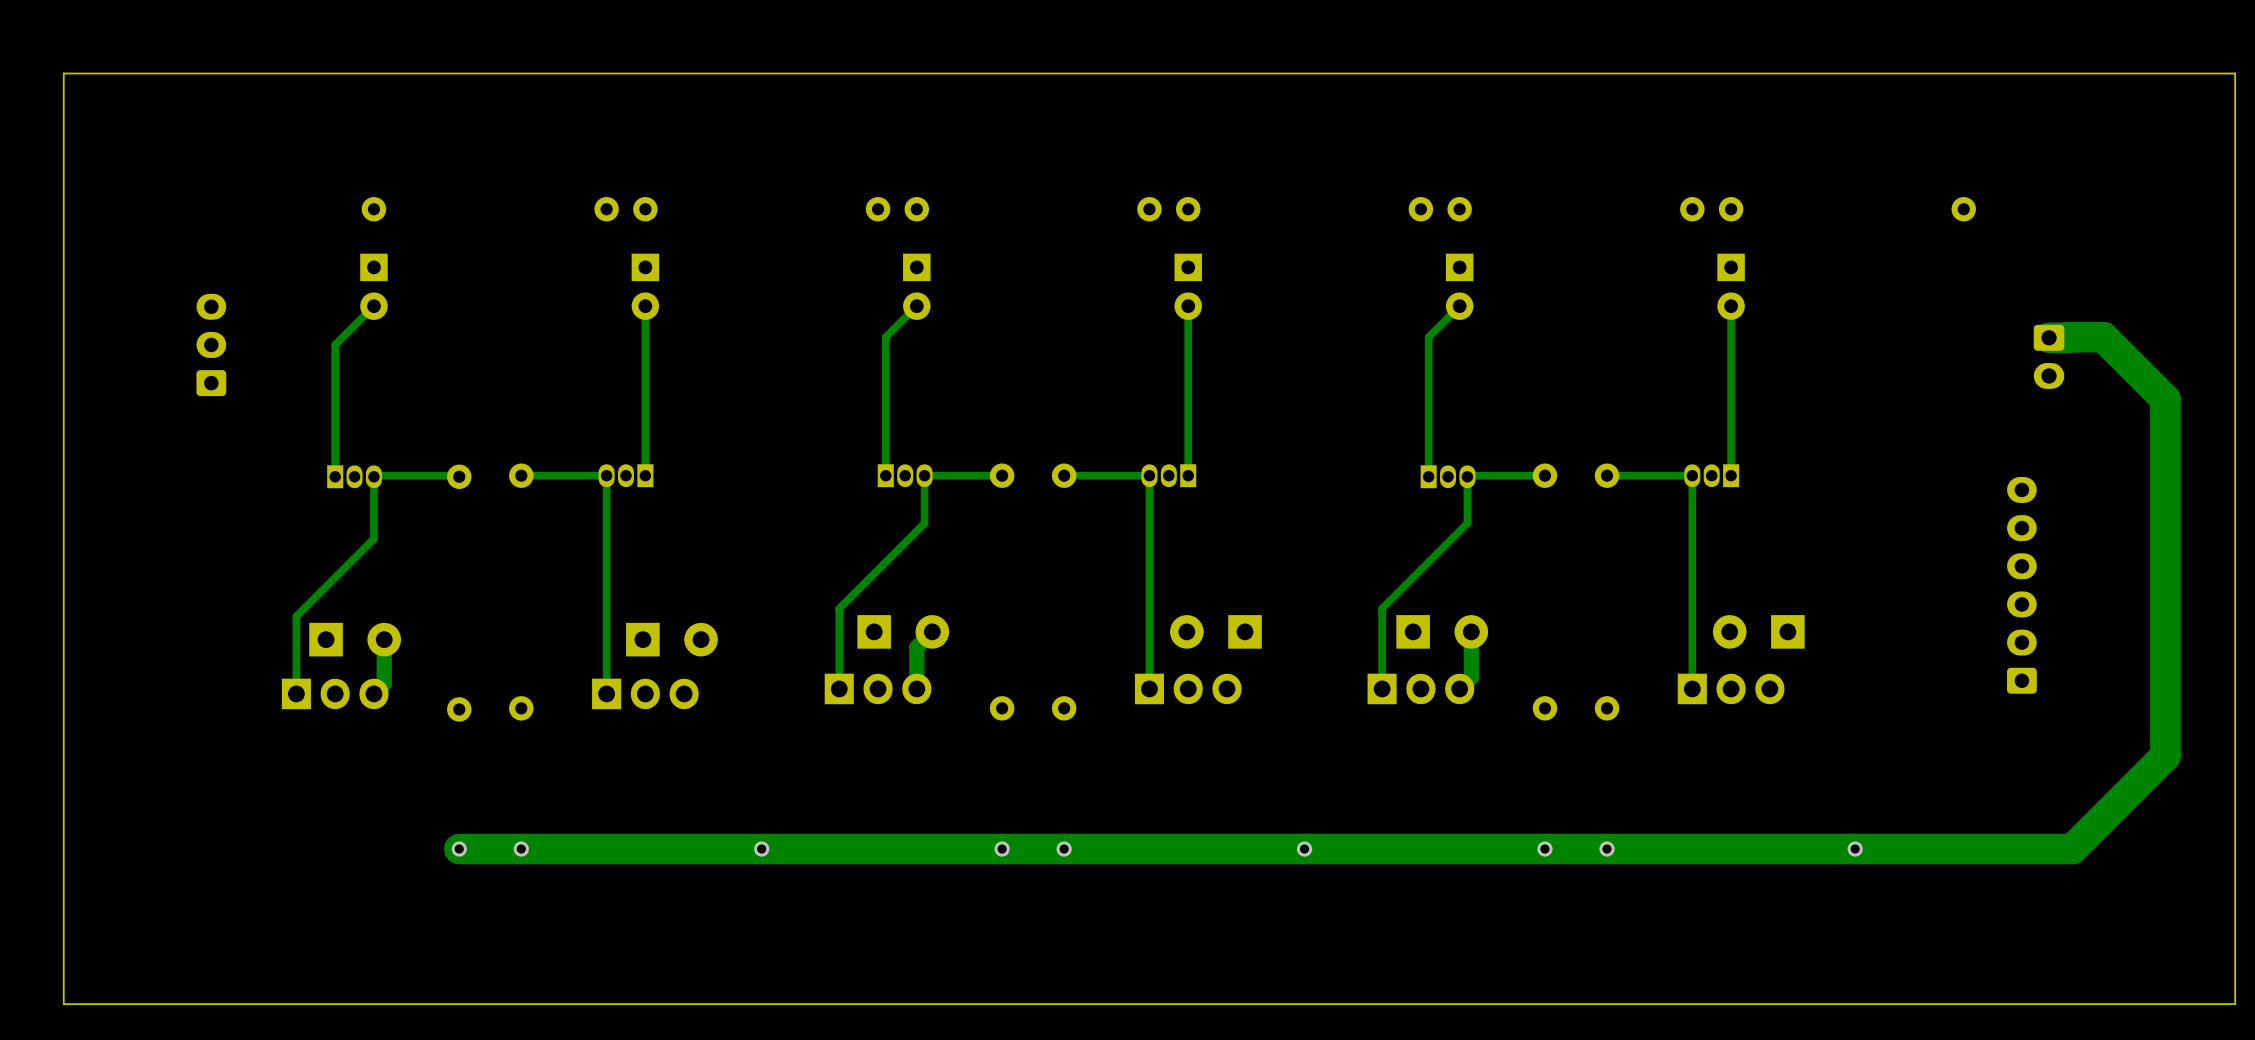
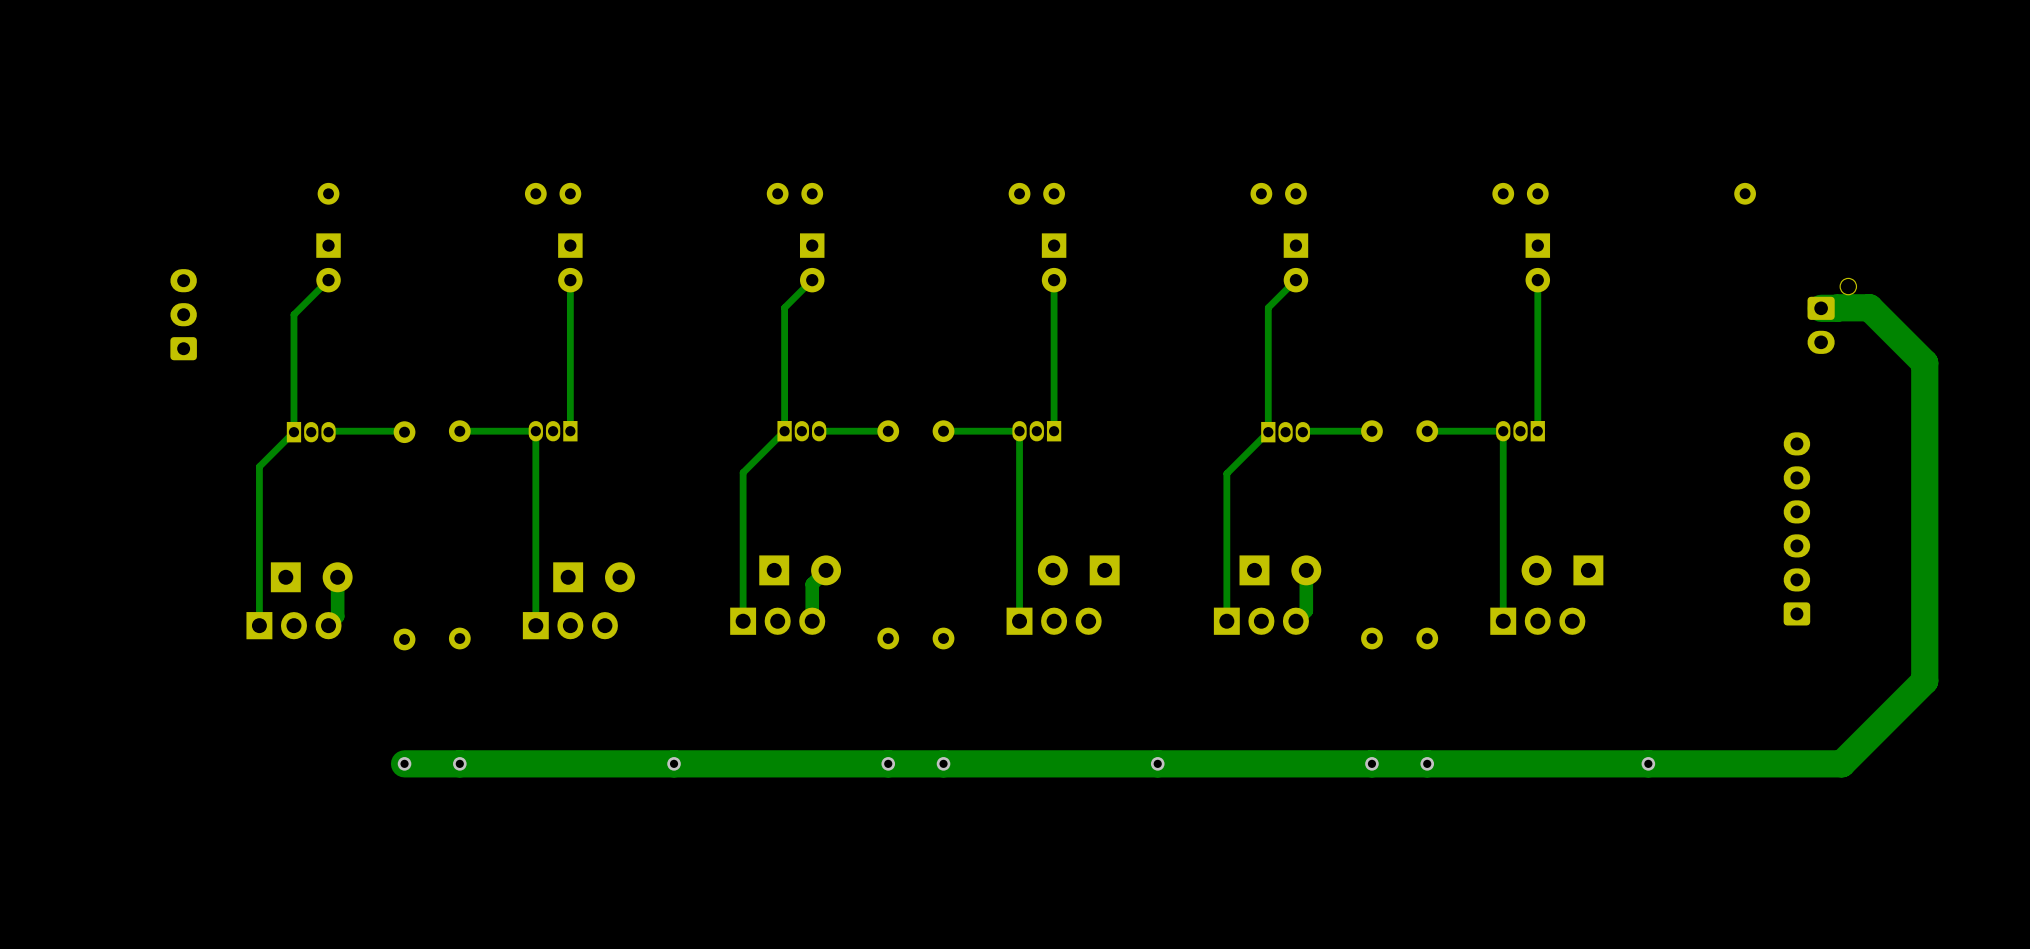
board edge: (2235, 73) (63, 73) (63, 1004) (2235, 1004) (2235, 73) -> none
part: none -> (1831, 316)
track: (924, 475) (924, 523) (839, 608) -> (784, 431) (743, 472) (743, 549)
track: (373, 476) (373, 538) (296, 616) -> (293, 432) (259, 466) (259, 556)
track: (1467, 476) (1467, 523) (1382, 608) -> (1268, 432) (1226, 473) (1226, 549)

